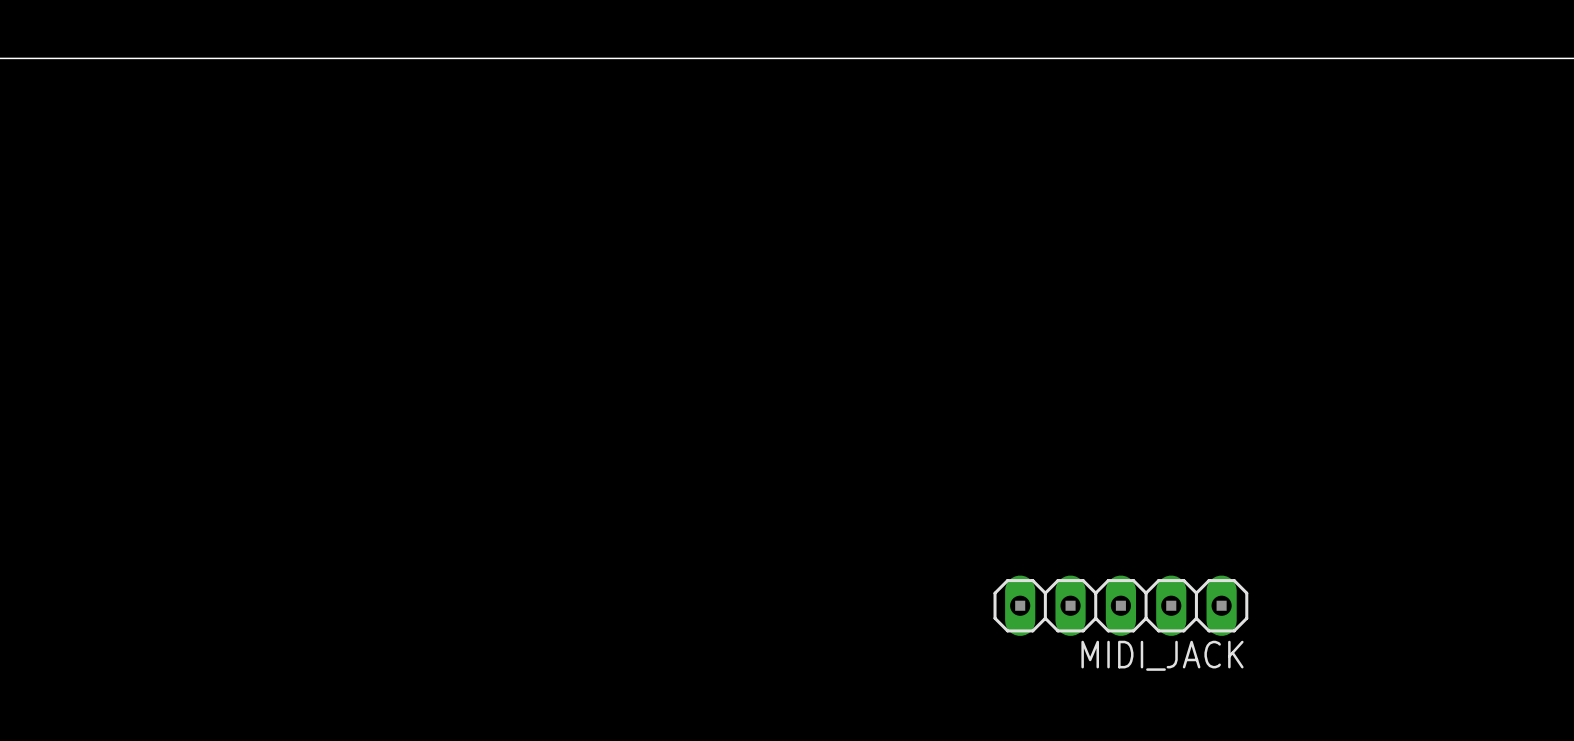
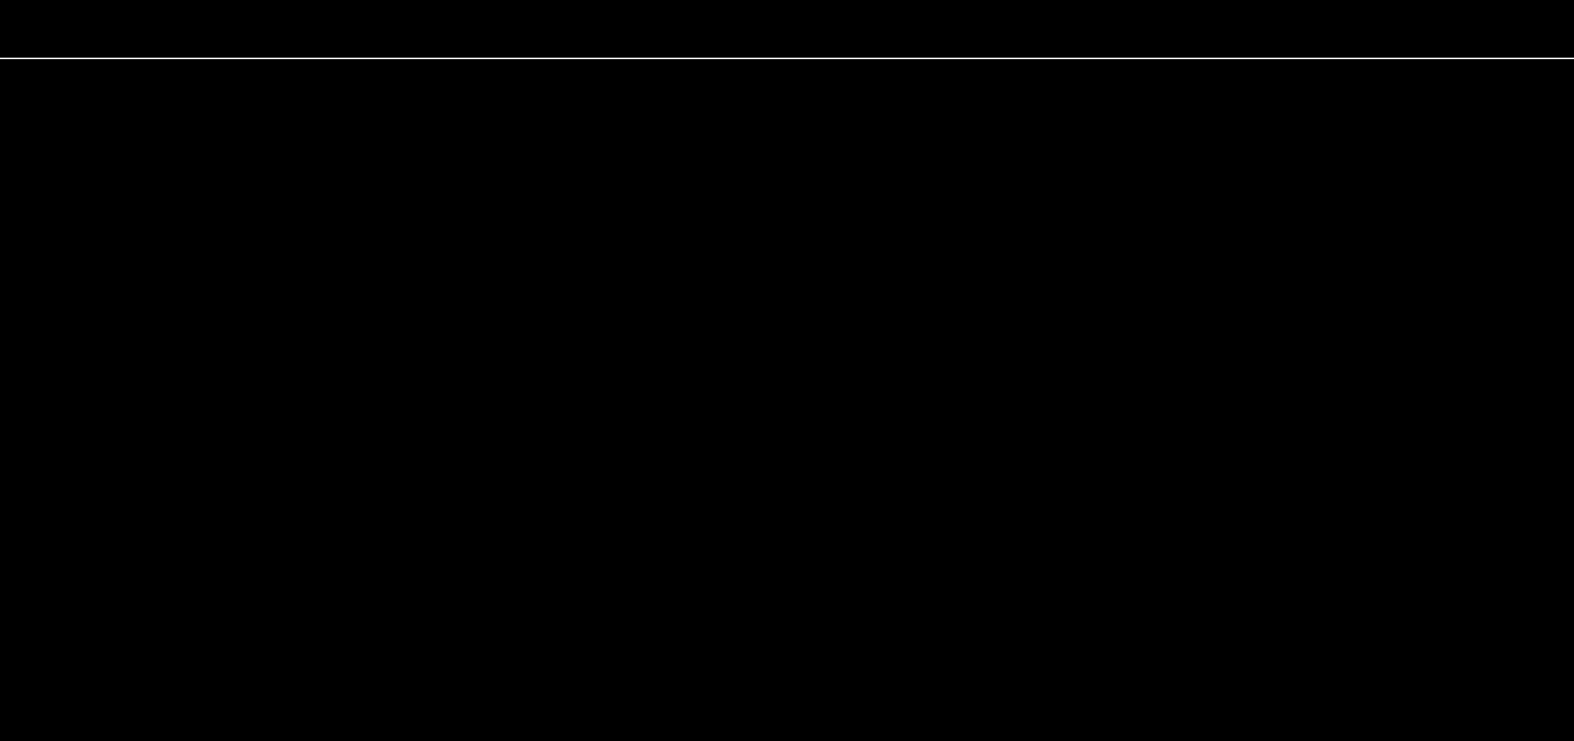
MIDI_JACK: (1120, 605) -> none

